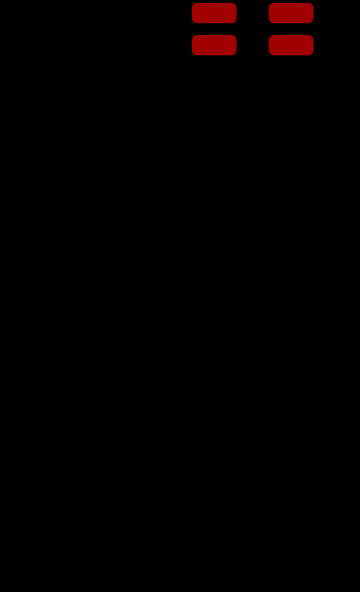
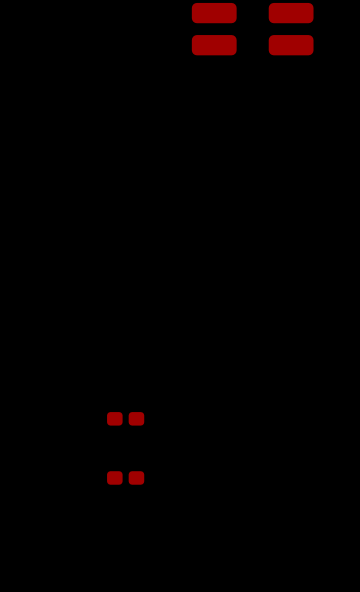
part: none -> (125, 418)
part: none -> (125, 477)

